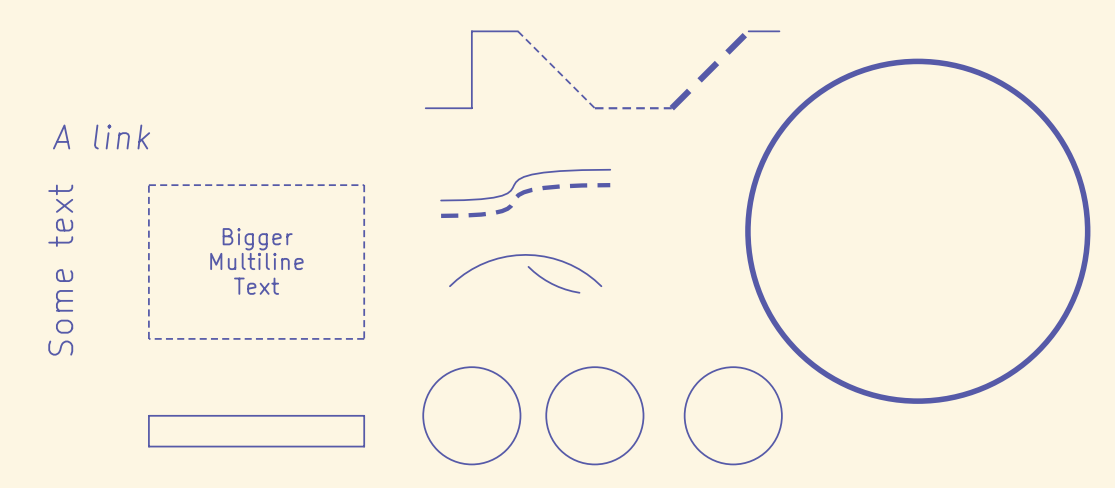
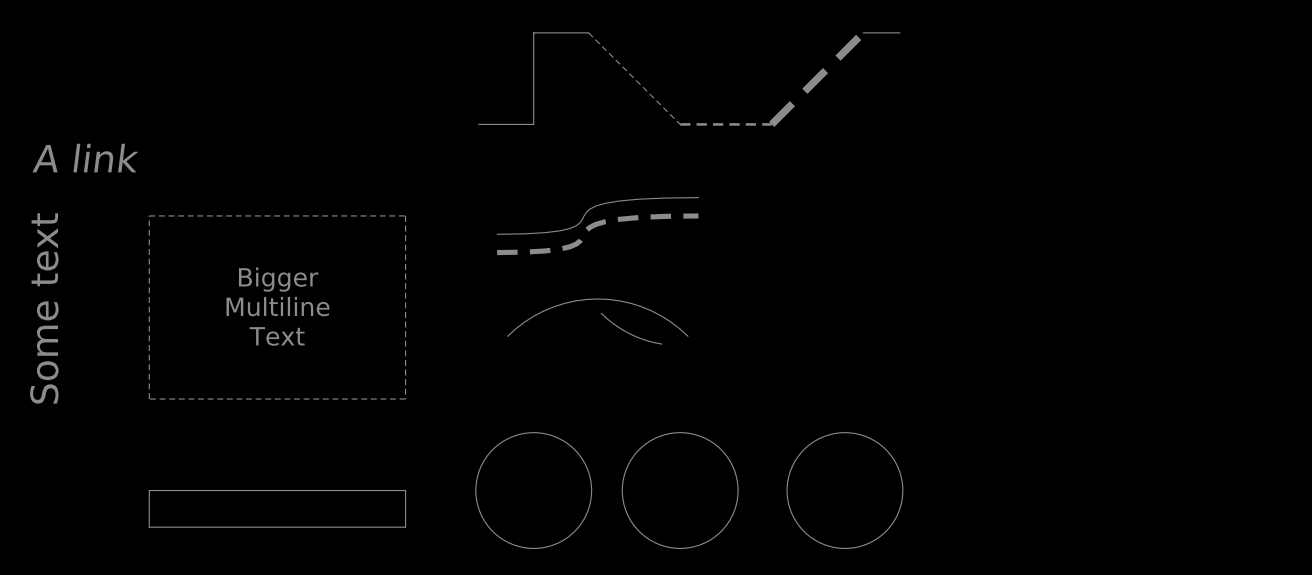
drawing: [745, 58, 1091, 404] -> none

